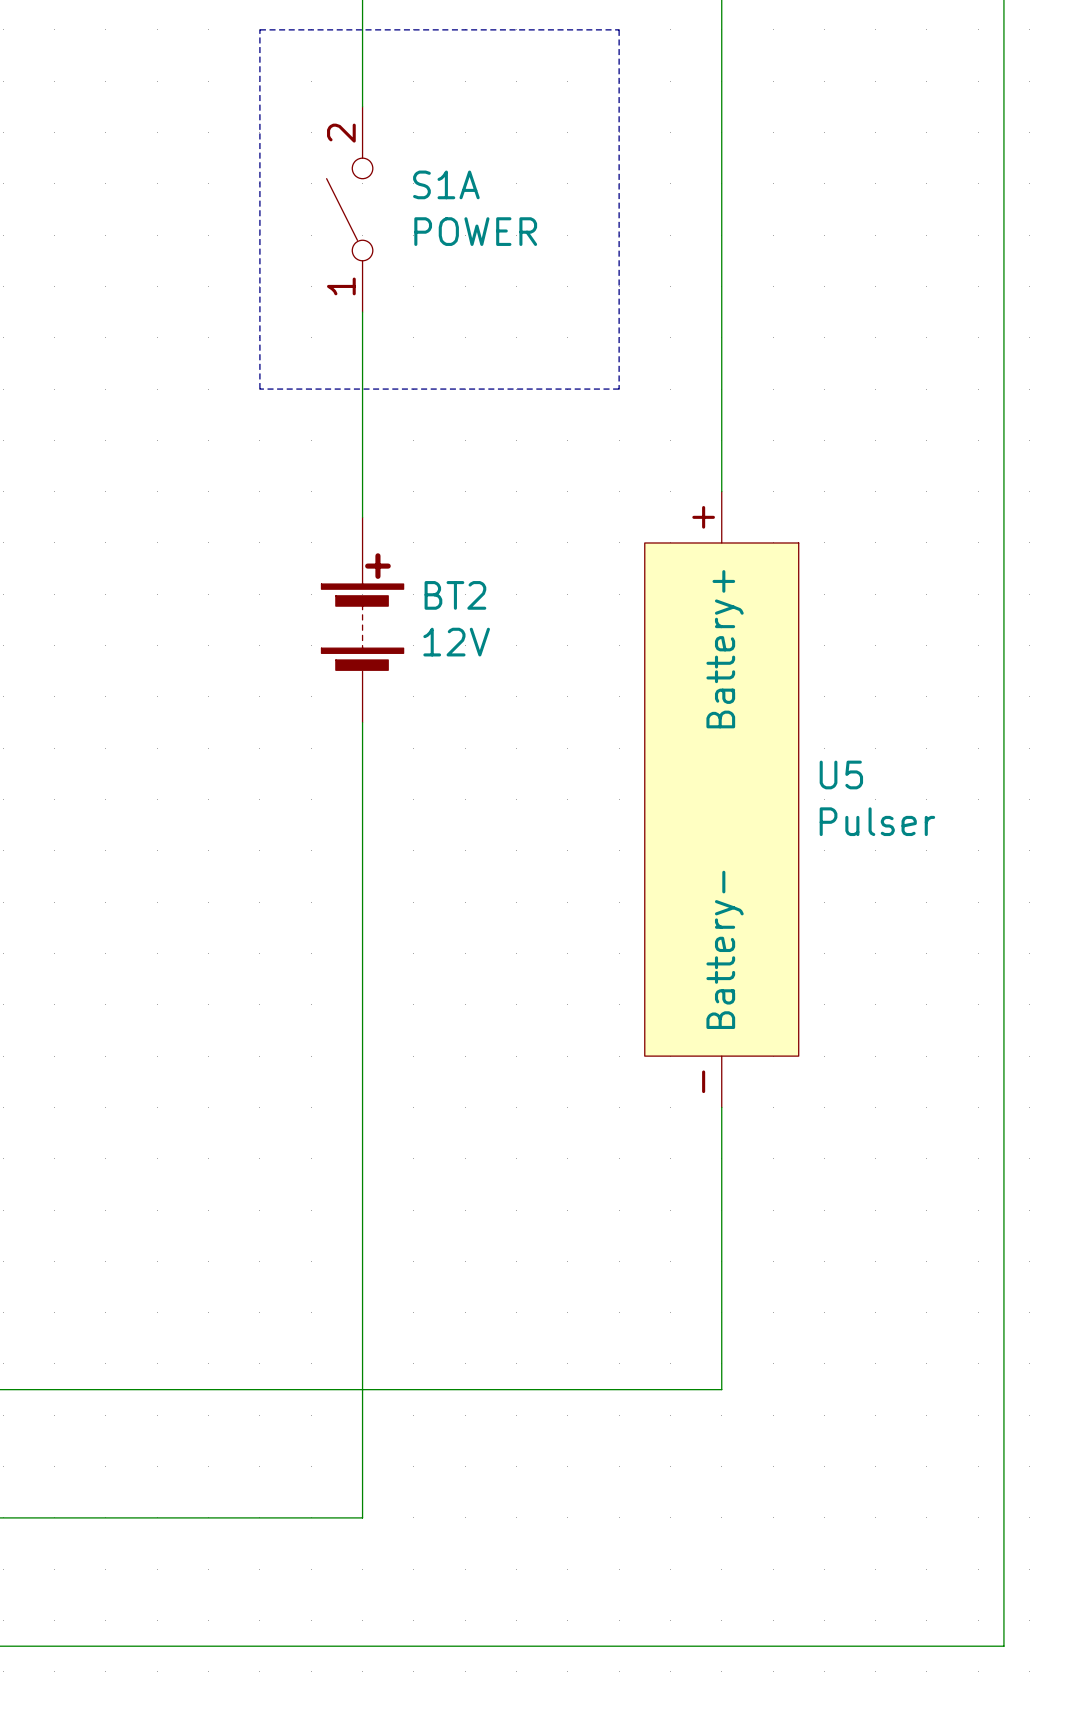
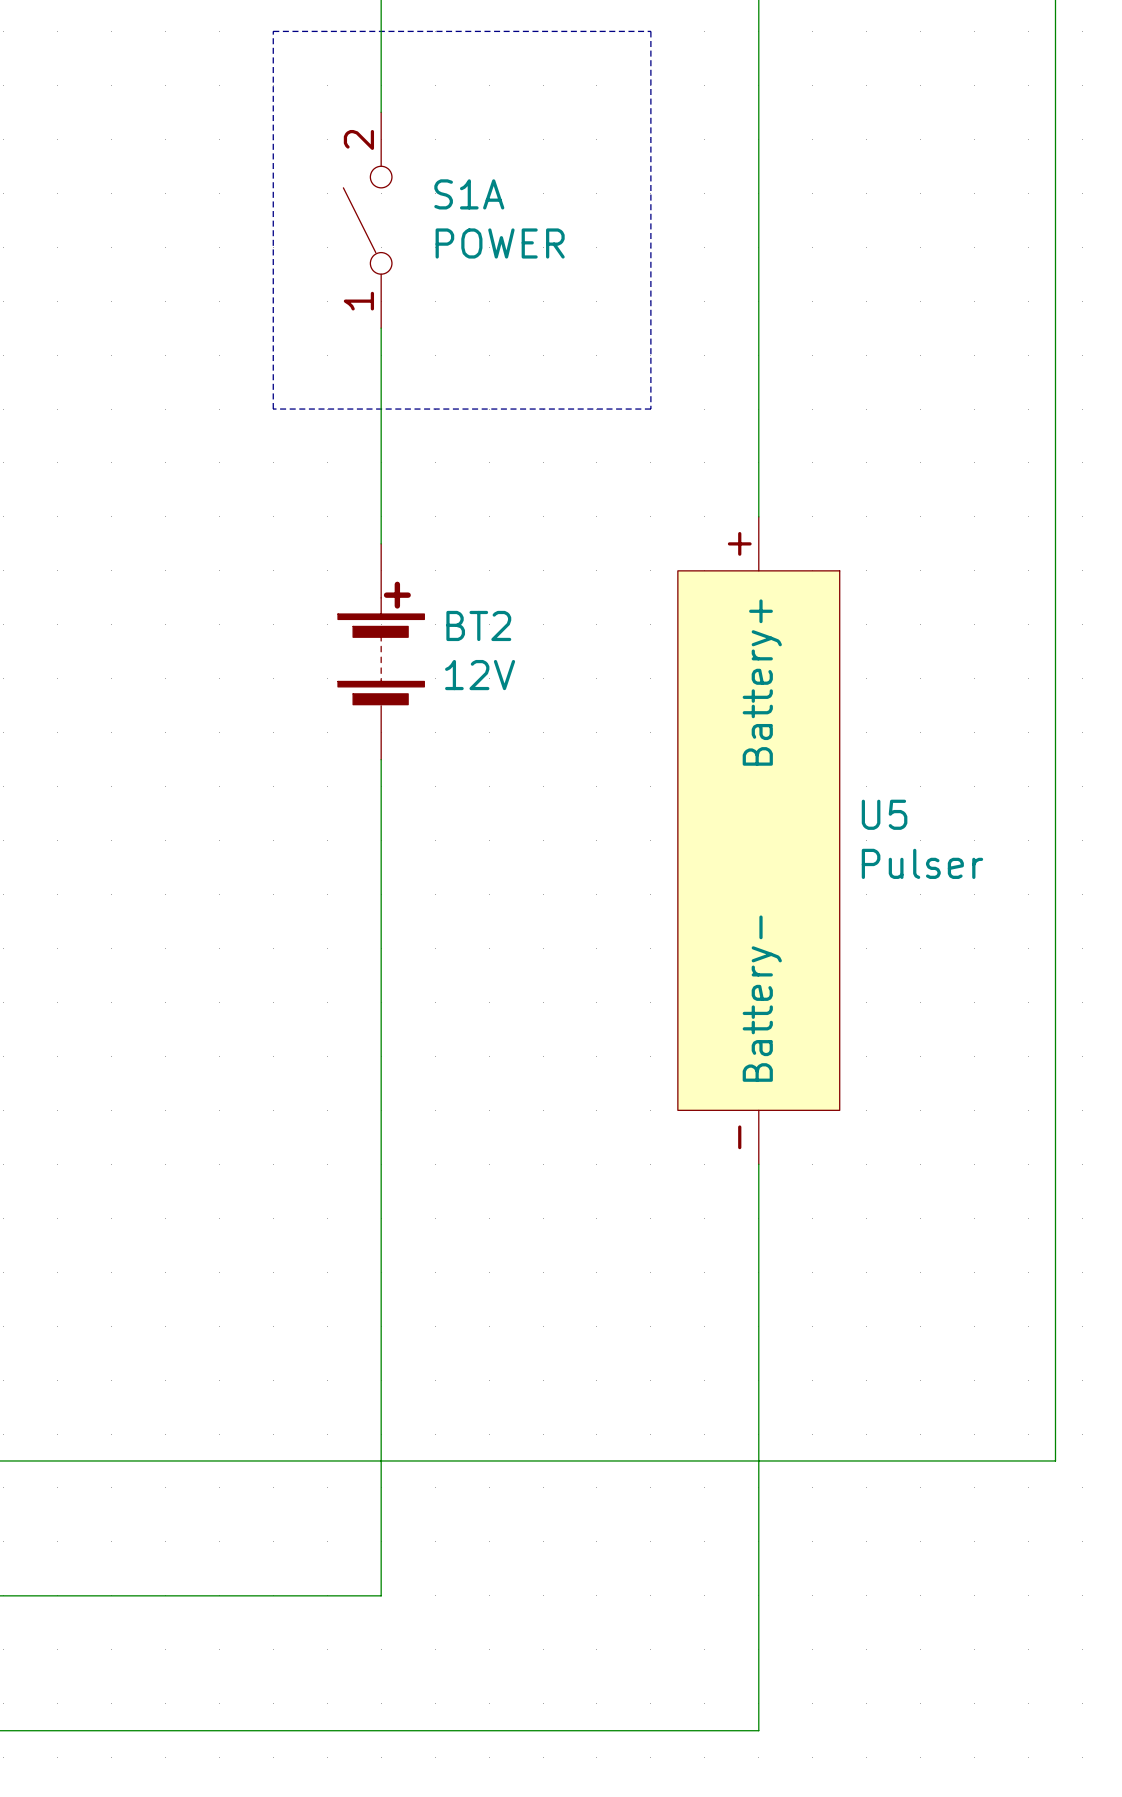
wire: (1003, 1389) (1003, 1646) (721, 1646) -> (1055, 1460) (758, 1460) (758, 1730)

